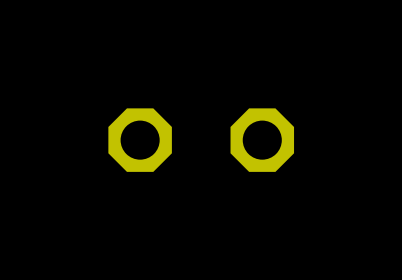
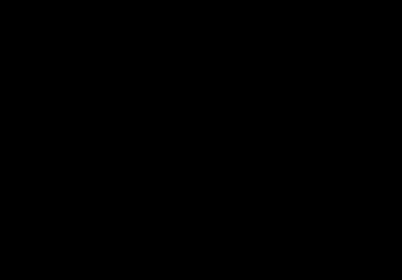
part: (201, 140) -> none

